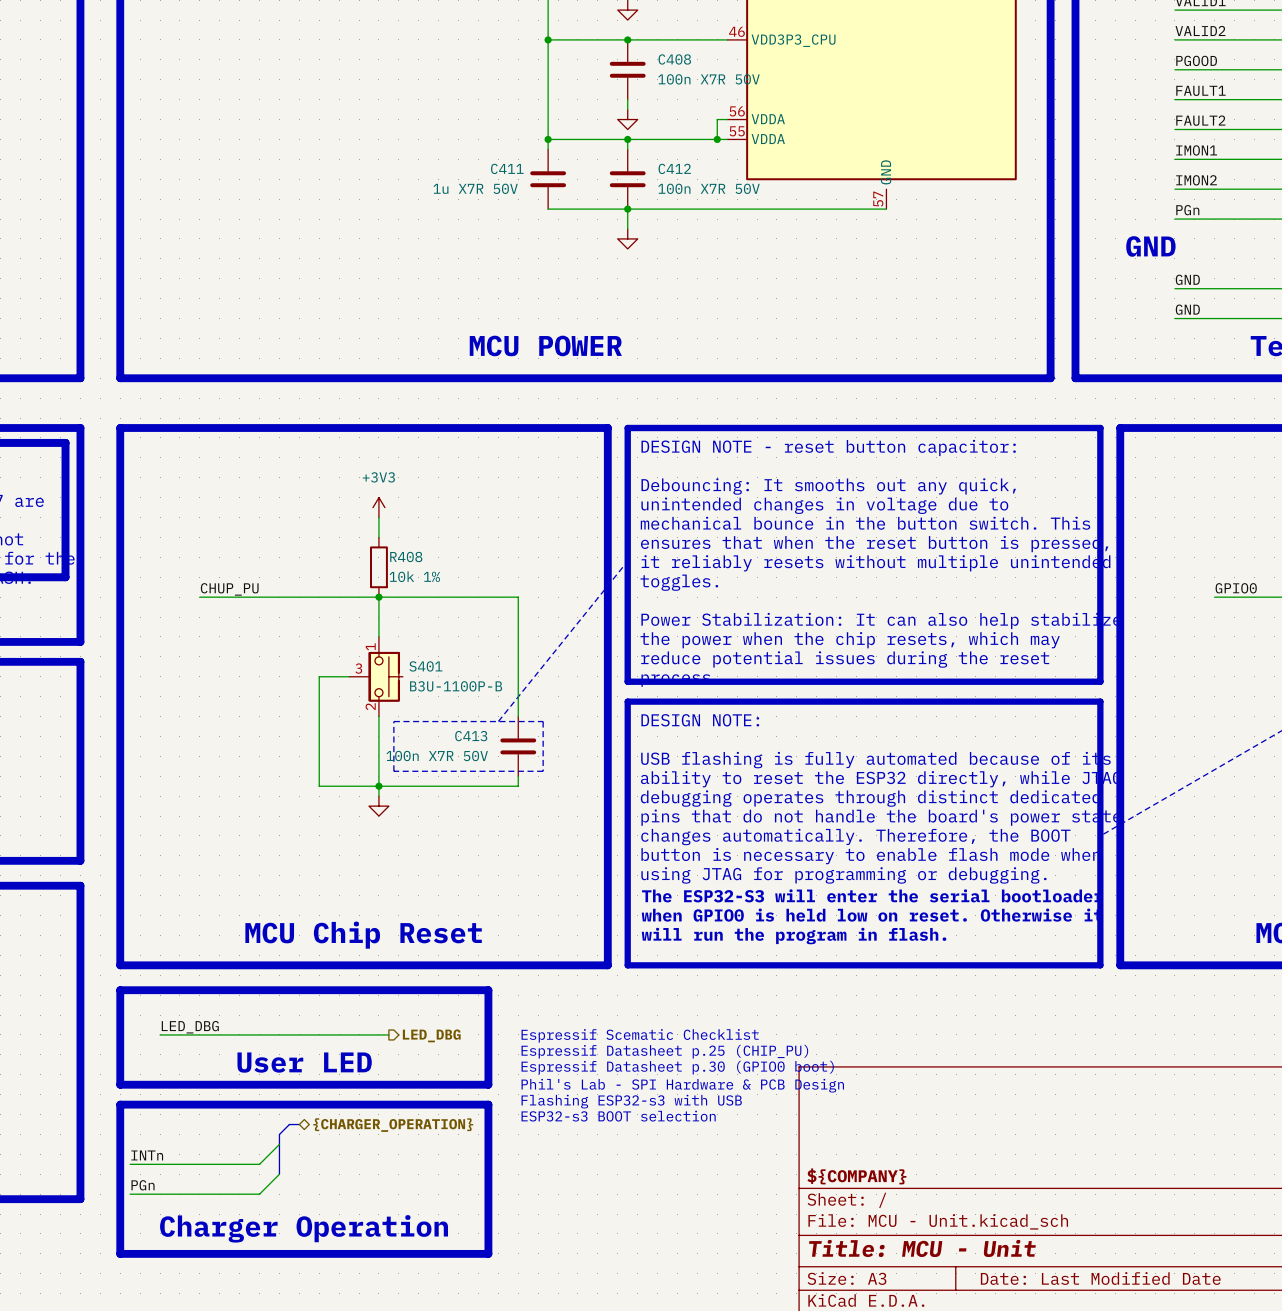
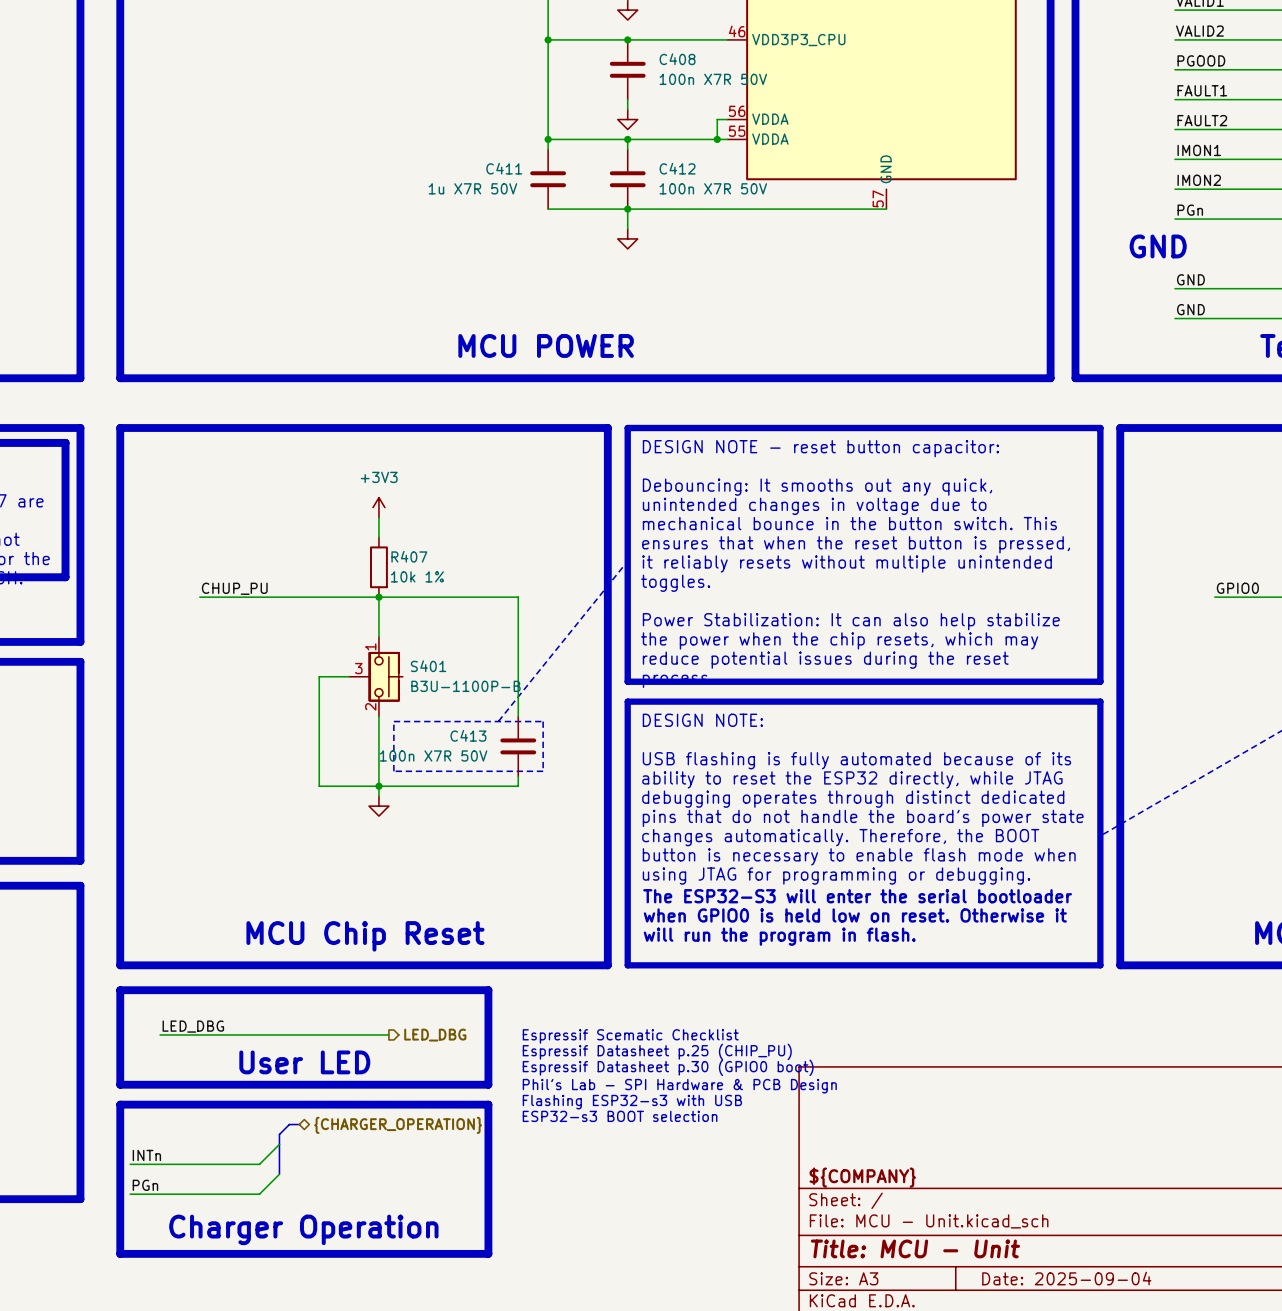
R408 name: R408 (406, 556) -> R407 (409, 556)
title block: Date: Last Modified Date (1100, 1278) -> Date: 2025-09-04 (1066, 1278)

